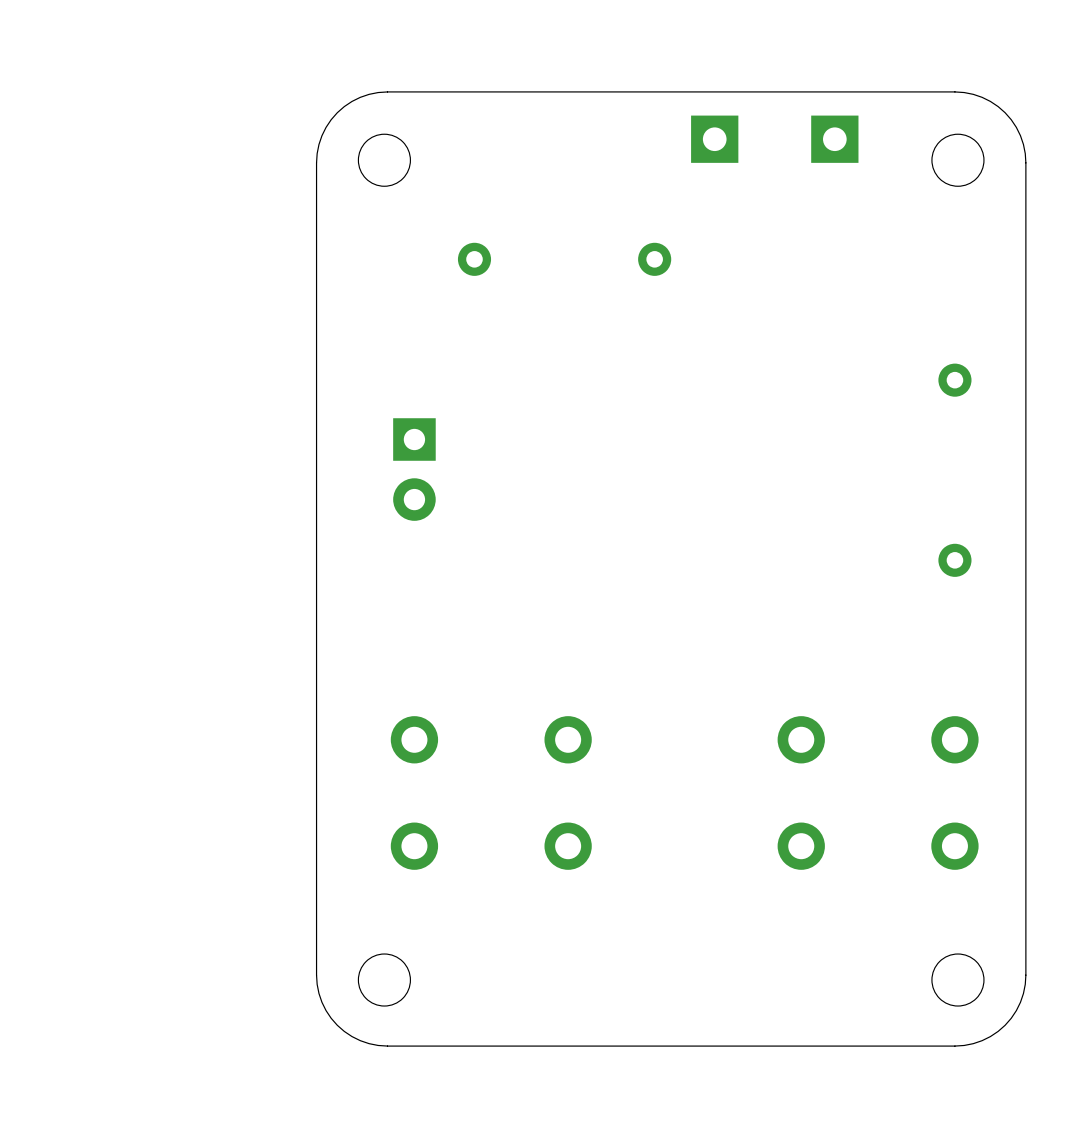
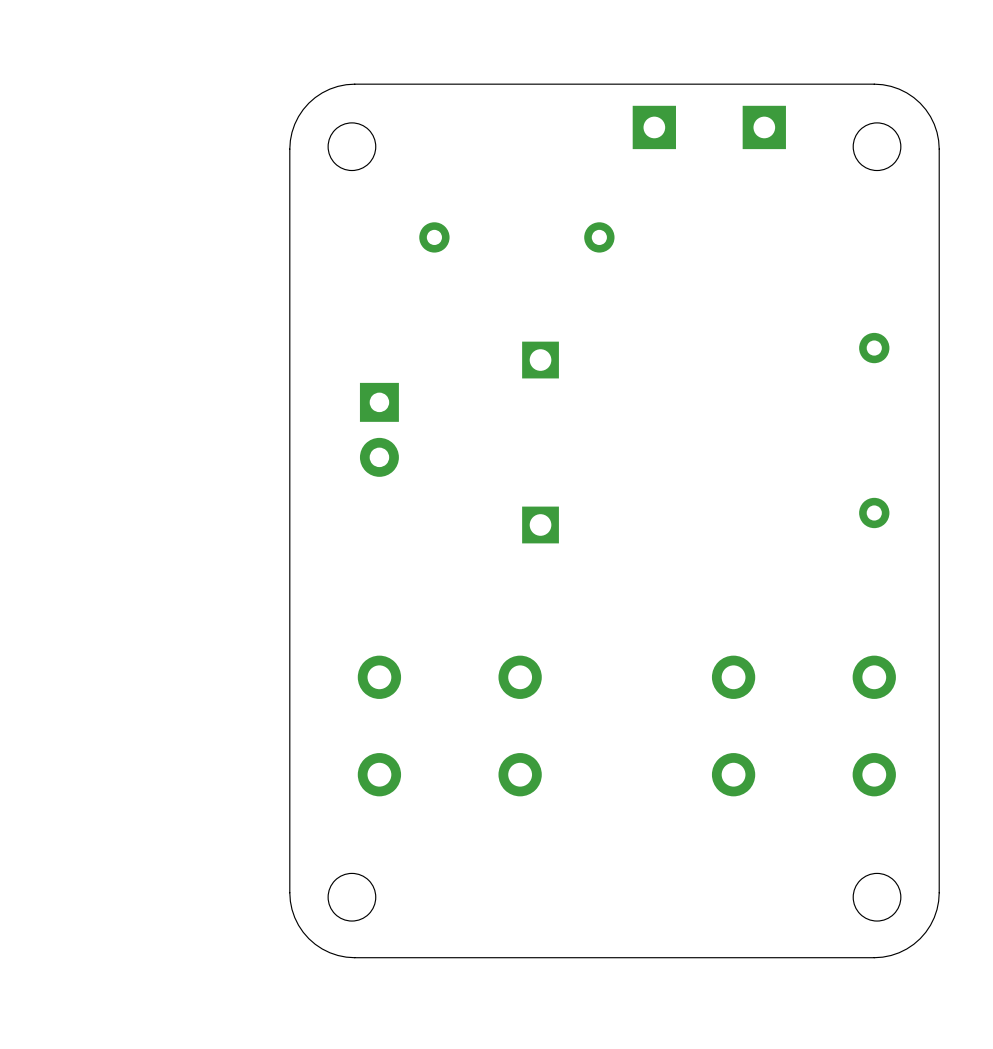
part: none -> (540, 360)
part: none -> (540, 524)

